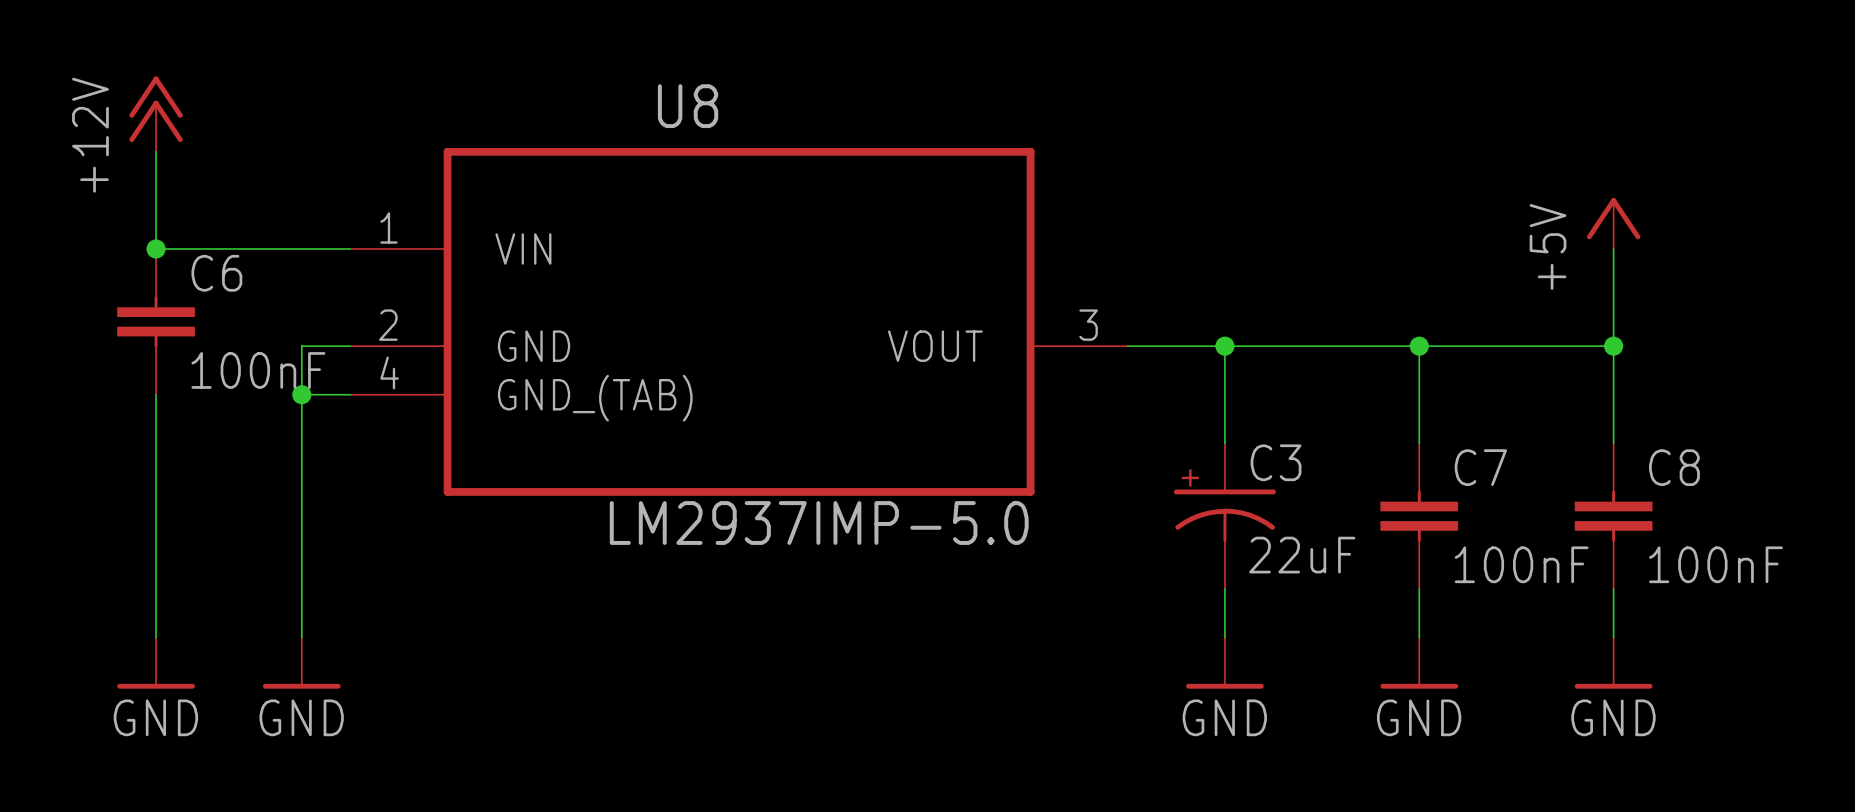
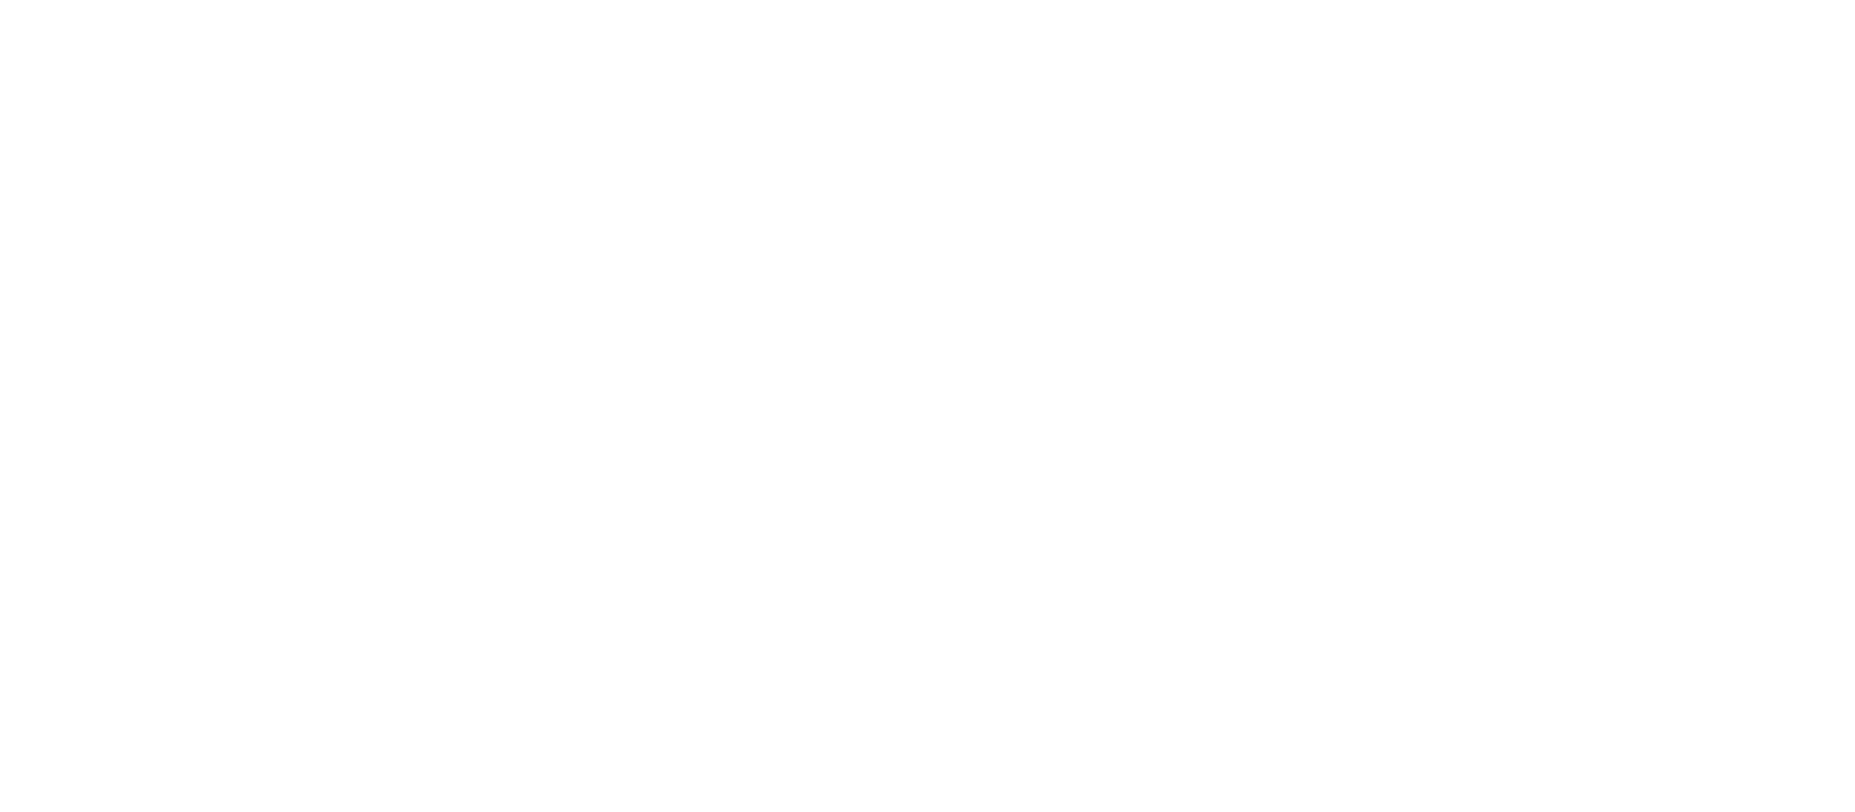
power symbol: +12V (156, 114) -> none
wire: (156, 151) (156, 248) (350, 248) -> none
power symbol: +5V (1613, 223) -> none
junction: (156, 248) -> none
wire: (1613, 248) (1613, 443) -> none
C6: 100nF (156, 321) -> none
U8: LM2937IMP-5.0 (739, 321) -> none
wire: (350, 346) (301, 346) (301, 637) -> none
wire: (1127, 346) (1613, 346) -> none
wire: (1224, 346) (1224, 443) -> none
junction: (1224, 346) -> none
wire: (1419, 346) (1419, 443) -> none
junction: (1419, 346) -> none
junction: (1613, 346) -> none
wire: (156, 394) (156, 637) -> none
wire: (301, 394) (350, 394) -> none
junction: (301, 394) -> none
C3: 22uF (1224, 516) -> none
C7: 100nF (1419, 516) -> none
C8: 100nF (1613, 516) -> none
wire: (1224, 589) (1224, 637) -> none
wire: (1419, 589) (1419, 637) -> none
wire: (1613, 589) (1613, 637) -> none
power symbol: GND (156, 663) -> none
power symbol: GND (301, 663) -> none
power symbol: GND (1224, 663) -> none
power symbol: GND (1419, 663) -> none
power symbol: GND (1613, 663) -> none

